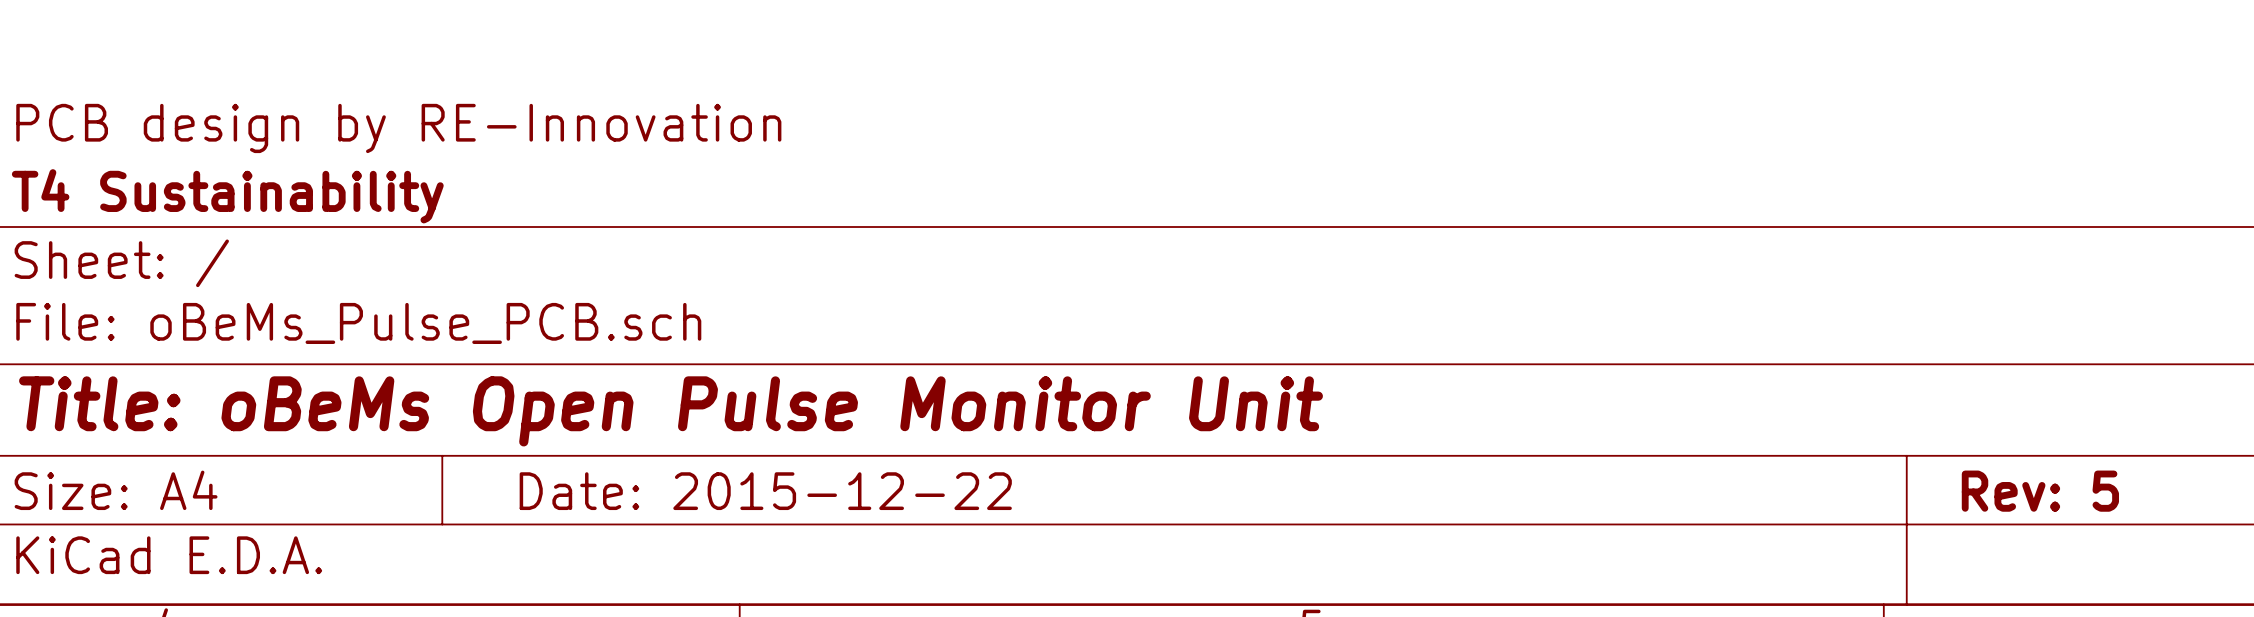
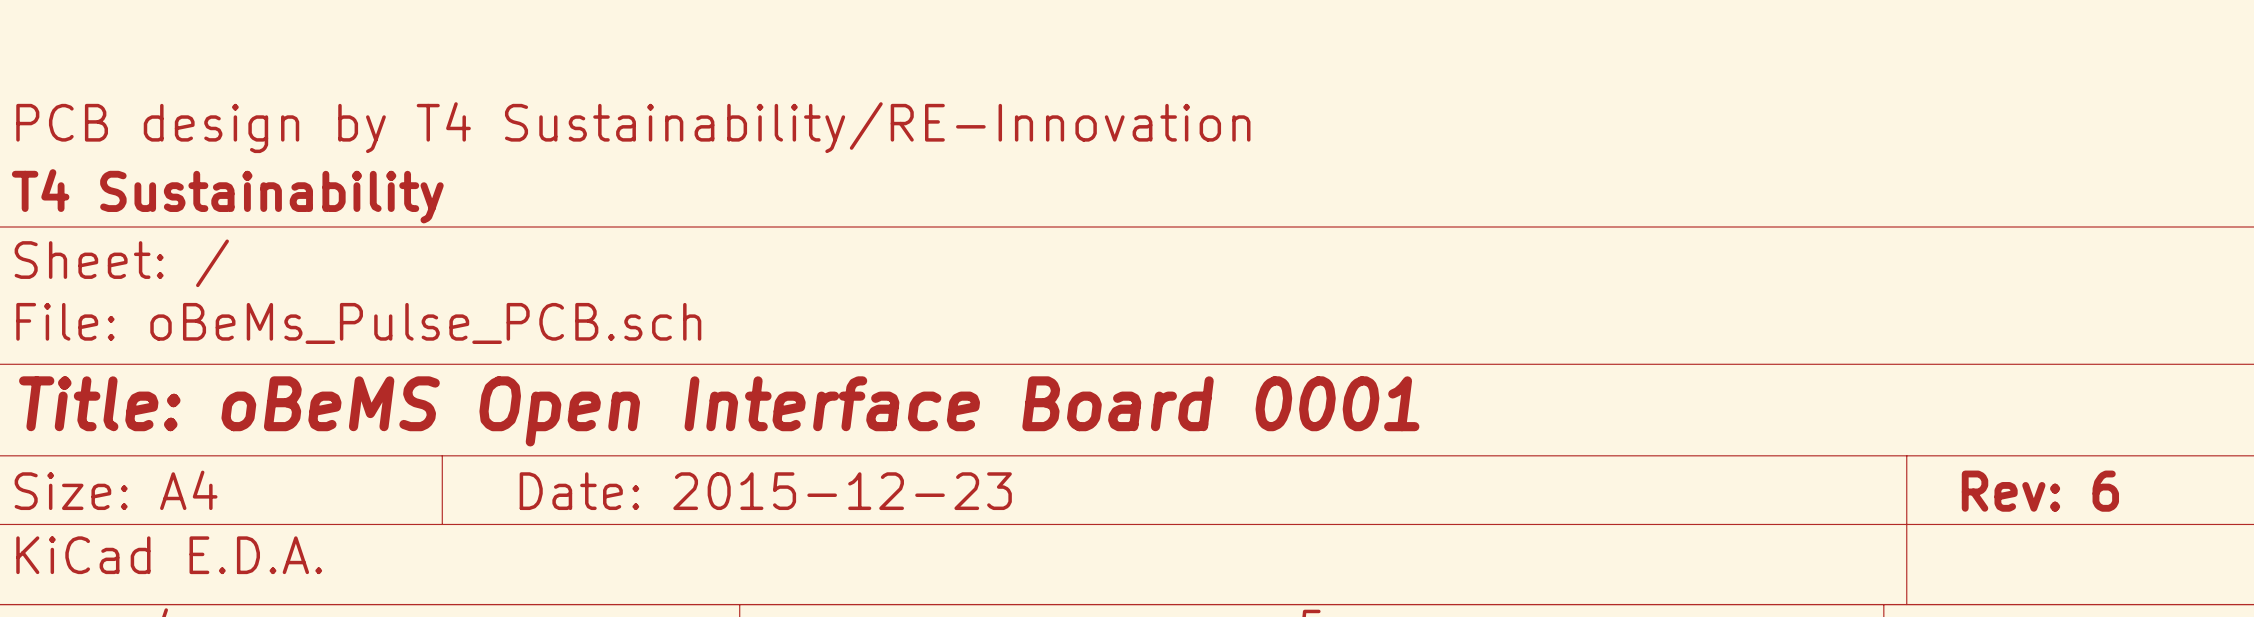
title block: PCB design by RE-Innovation (398, 128) -> PCB design by T4 Sustainability/RE-Innovation (633, 127)
title block: Title: oBeMs Open Pulse Monitor Unit (671, 411) -> Title: oBeMS Open Interface Board 0001 (719, 411)
title block: Date: 2015-12-22 (765, 491) -> Date: 2015-12-23 (765, 491)
title block: Rev: 5 (2040, 491) -> Rev: 6 (2040, 491)

